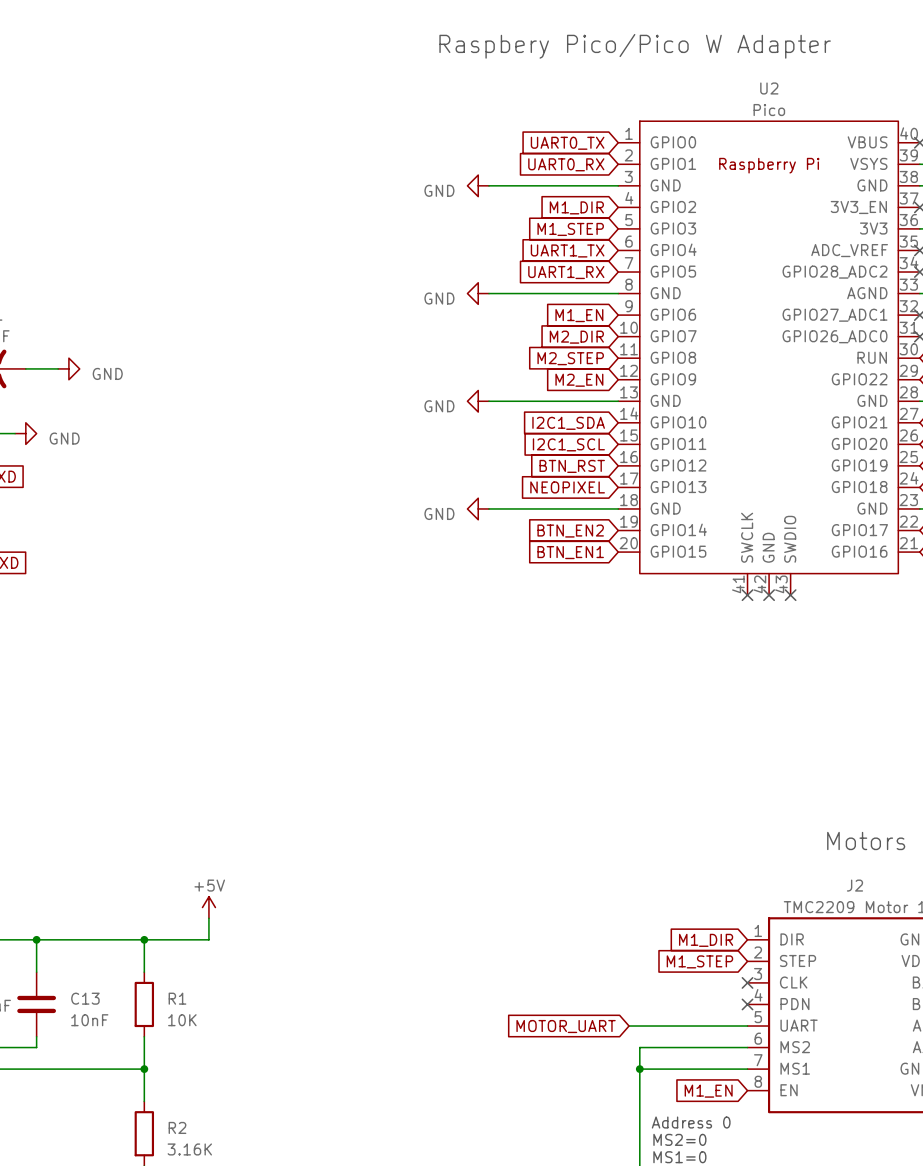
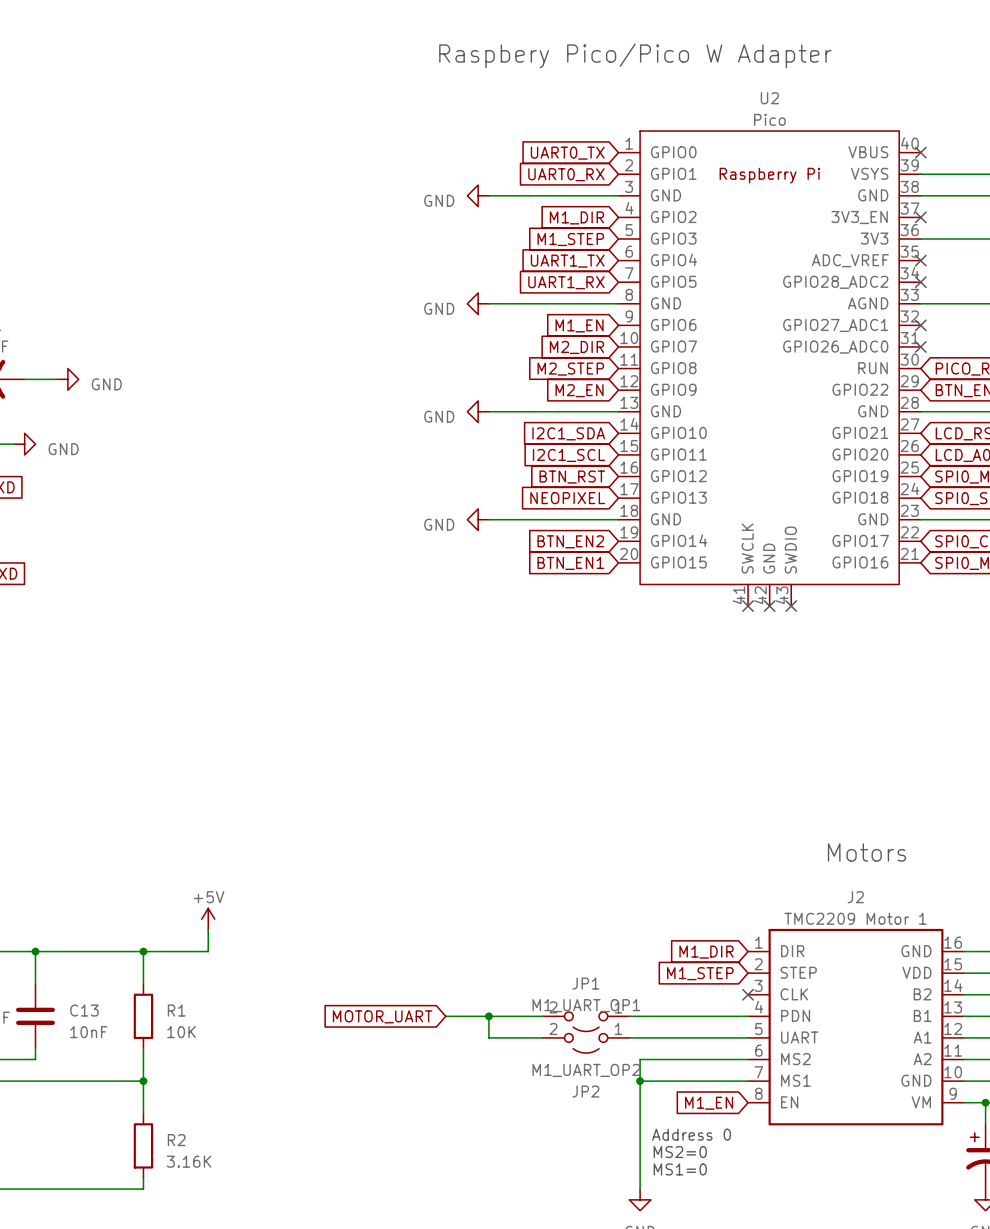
wire: none -> (445, 1016) (542, 1016)
wire: none -> (488, 1016) (488, 1037) (542, 1037)
junction: none -> (488, 1016)
wire: none -> (629, 1016) (748, 1016)
no-connect mark: (747, 1004) -> none
JP1: none -> M1_UART_OP1 (586, 1021)
global label position: MOTOR_UART (566, 1026) -> MOTOR_UART (382, 1016)
JP2: none -> M1_UART_OP2 (586, 1043)

